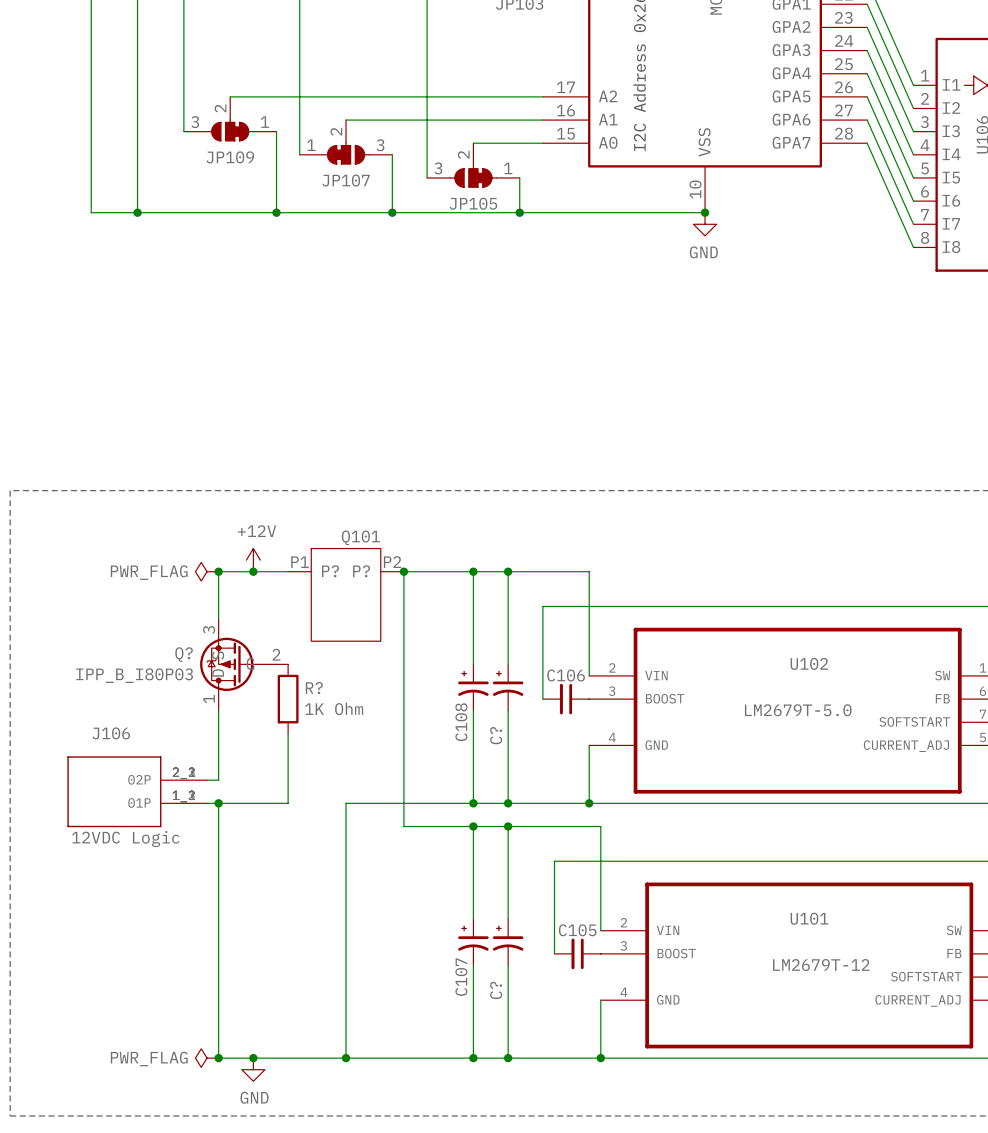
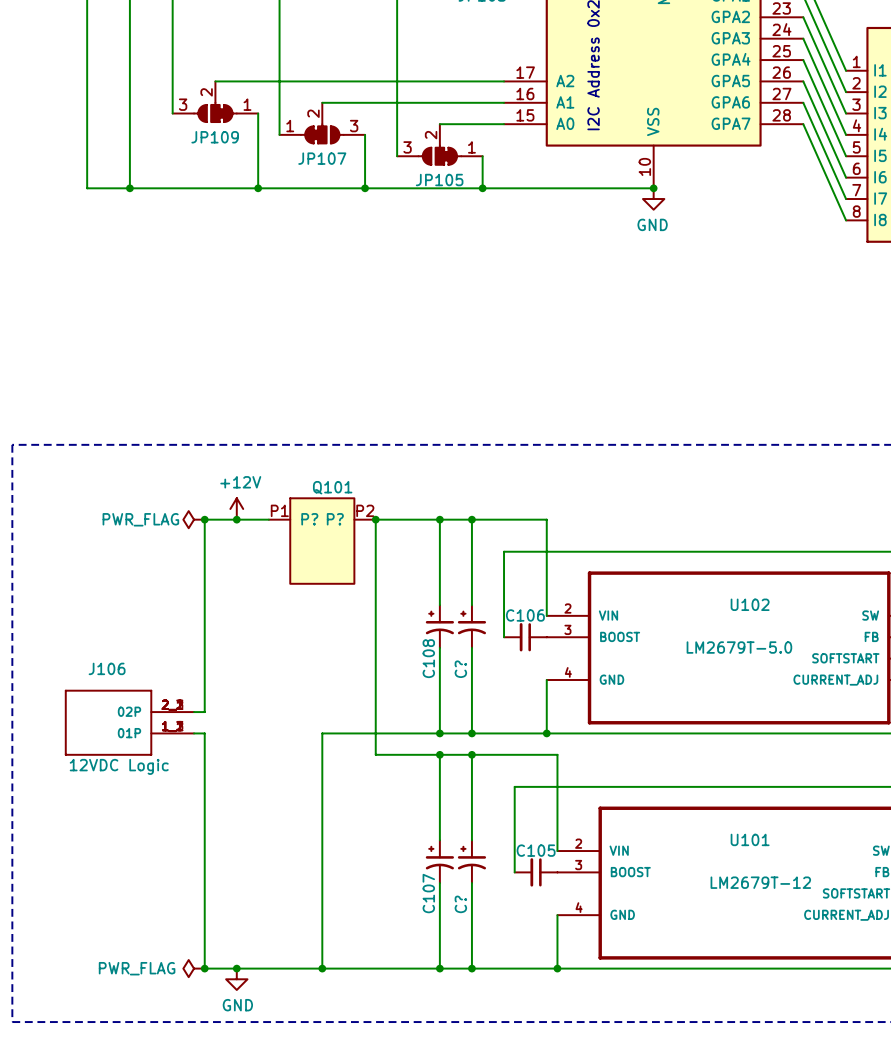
Q?: IPP_B_I80P03 (244, 664) -> none
R?: 1K Ohm (288, 699) -> none
wire: (288, 733) (288, 803) (218, 803) -> none
junction: (218, 803) -> none

